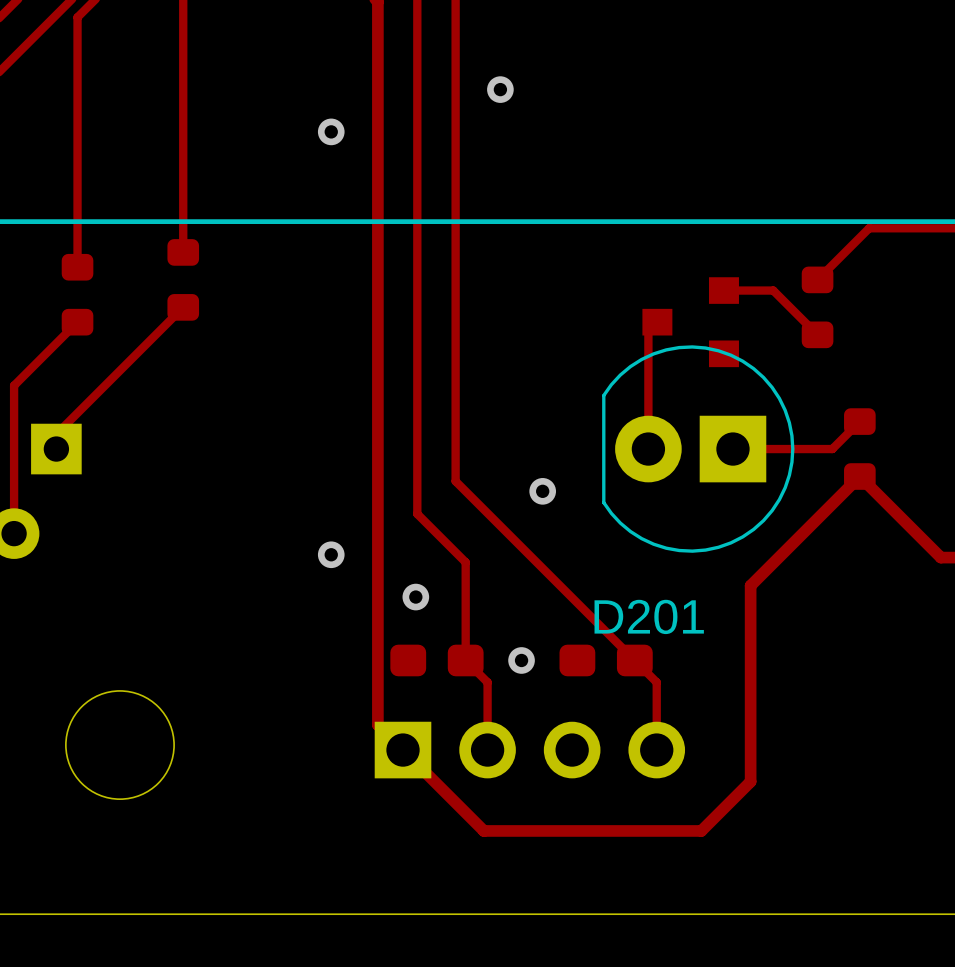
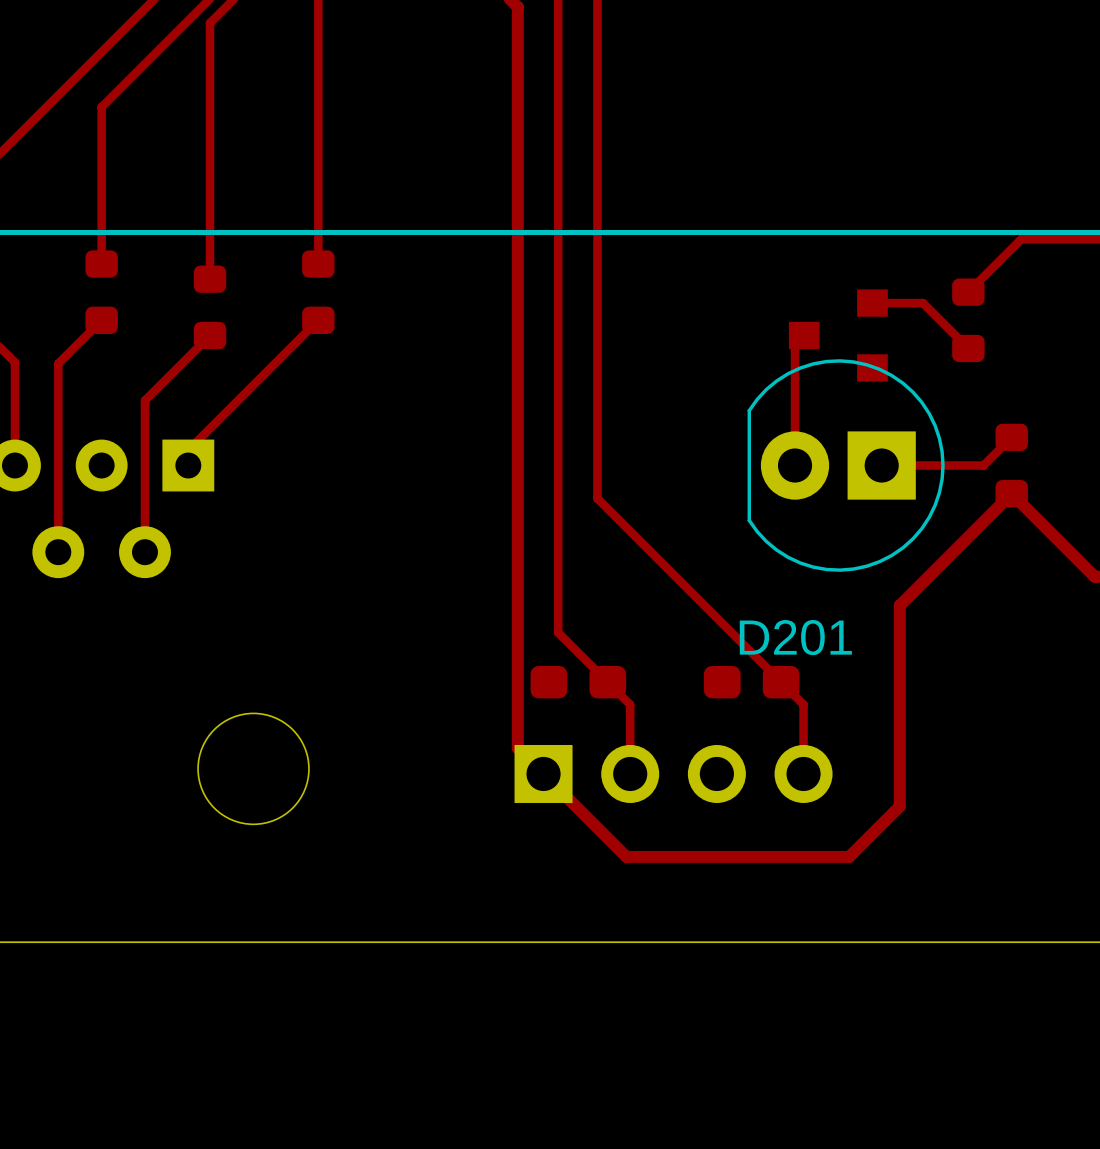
via: (500, 89) -> none
via: (331, 131) -> none
via: (542, 491) -> none
top track: (417, 513) (465, 562) (465, 660) -> (558, 532) (558, 632) (607, 682)
via: (331, 554) -> none
via: (415, 597) -> none
via: (521, 660) -> none

